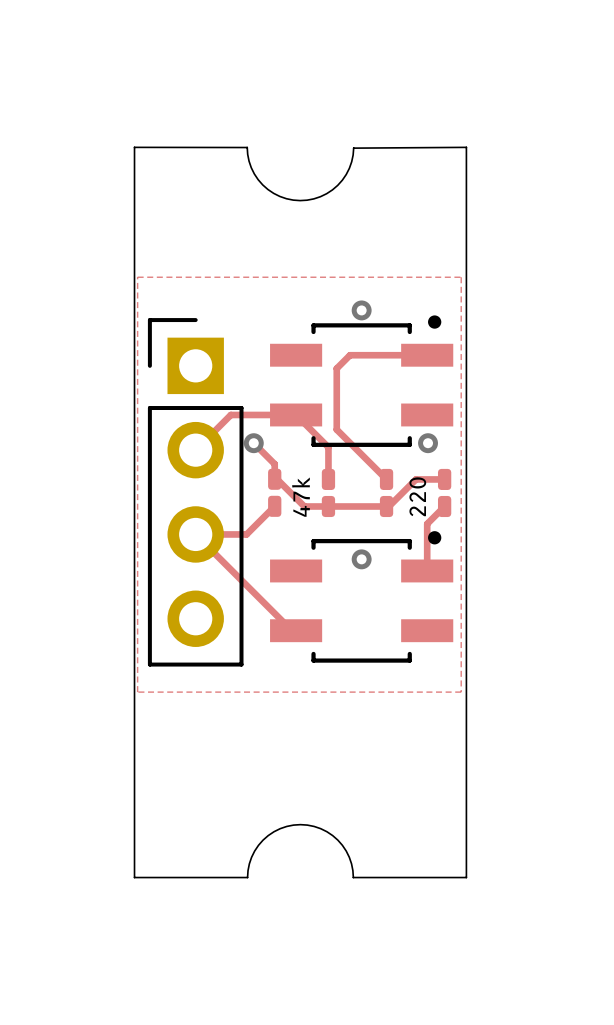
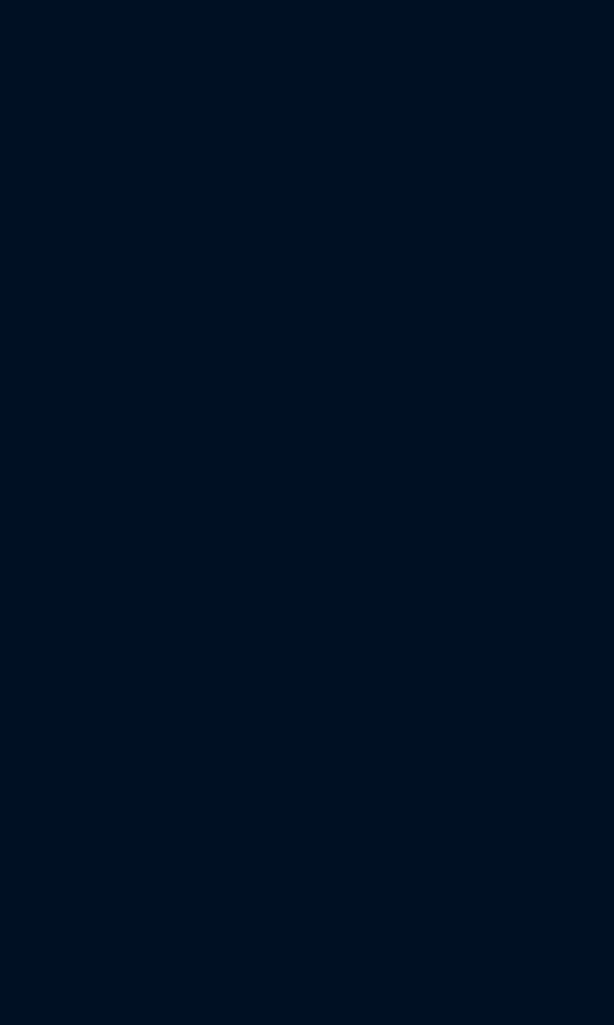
board edge: (134, 147) (247, 147) (251, 167) (262, 184) (279, 196) (300, 200) (320, 196) (337, 185) (349, 168) (353, 148) (466, 147) (466, 877) (353, 877) (349, 857) (337, 840) (320, 828) (300, 824) (280, 828) (263, 840) (251, 857) (247, 877) (134, 877) (134, 147) -> none
zone outline: (137, 277) (461, 277) (461, 692) (137, 692) (137, 277) -> none
via: (361, 310) -> none
track: (427, 355) (350, 355) (336, 368) (336, 429) (386, 479) -> none
part: (361, 381) -> none
track: (253, 443) (274, 464) (274, 479) (277, 479) (304, 506) (388, 506) (415, 479) (444, 479) -> none
via: (253, 443) -> none
via: (428, 443) -> none
track: (195, 450) (230, 414) (296, 414) (328, 447) (328, 479) -> none
part: (195, 492) -> none
part: (274, 492) -> none
part: (328, 492) -> none
part: (386, 492) -> none
part: (444, 492) -> none
text: 220 (417, 496) -> none
text: 47k (300, 497) -> none
track: (274, 506) (246, 534) (195, 534) (291, 630) (296, 630) -> none
track: (444, 506) (427, 523) (427, 570) -> none
via: (361, 559) -> none
part: (361, 596) -> none

